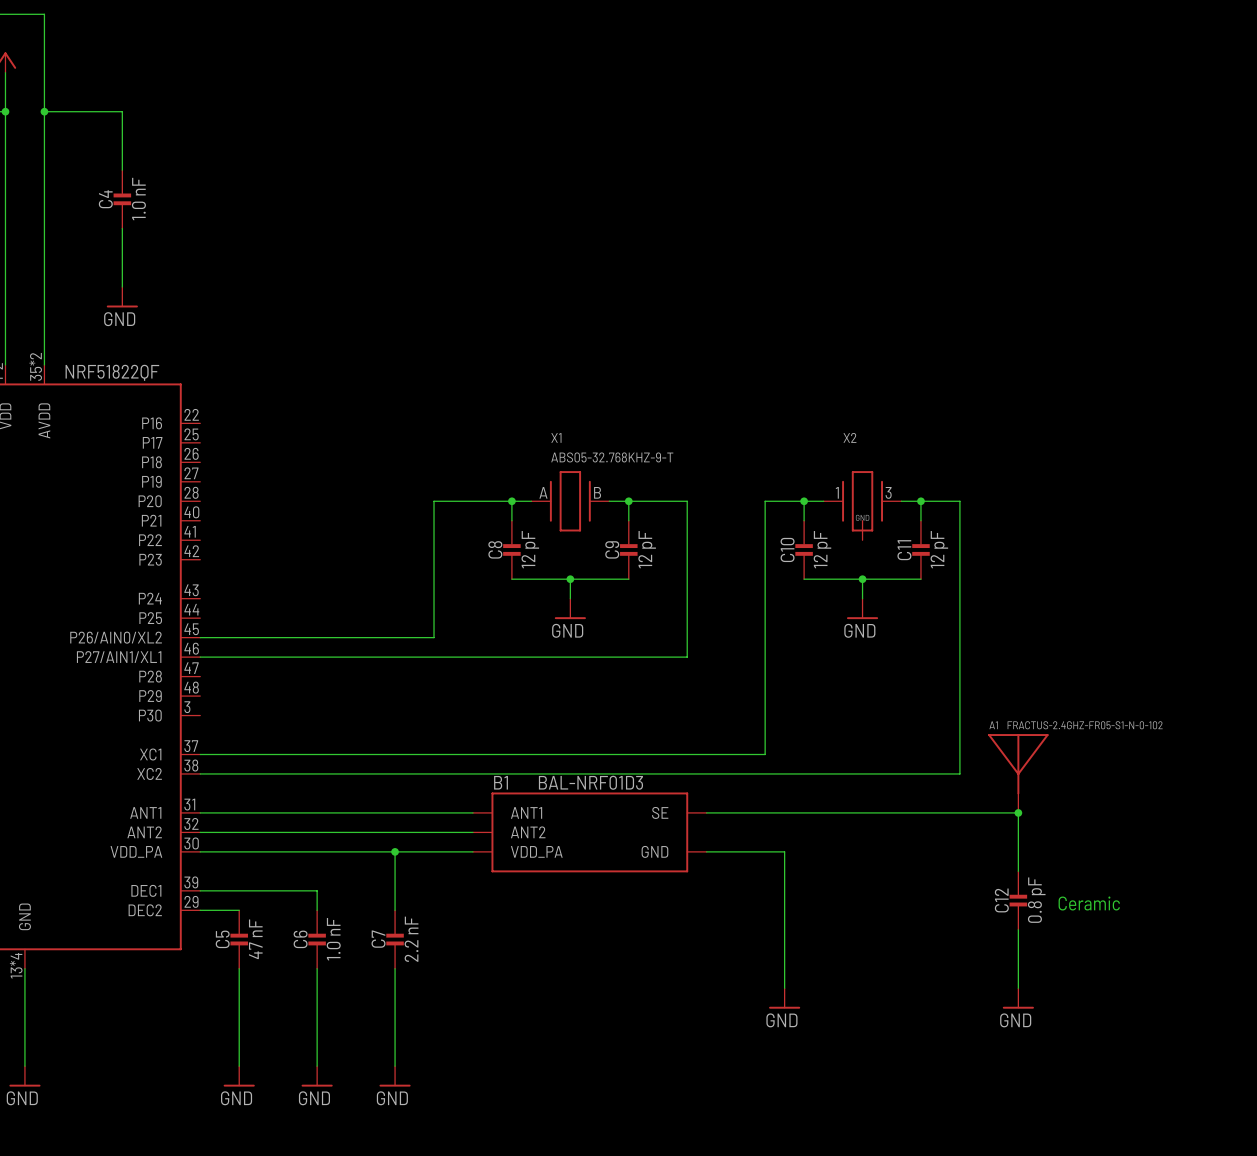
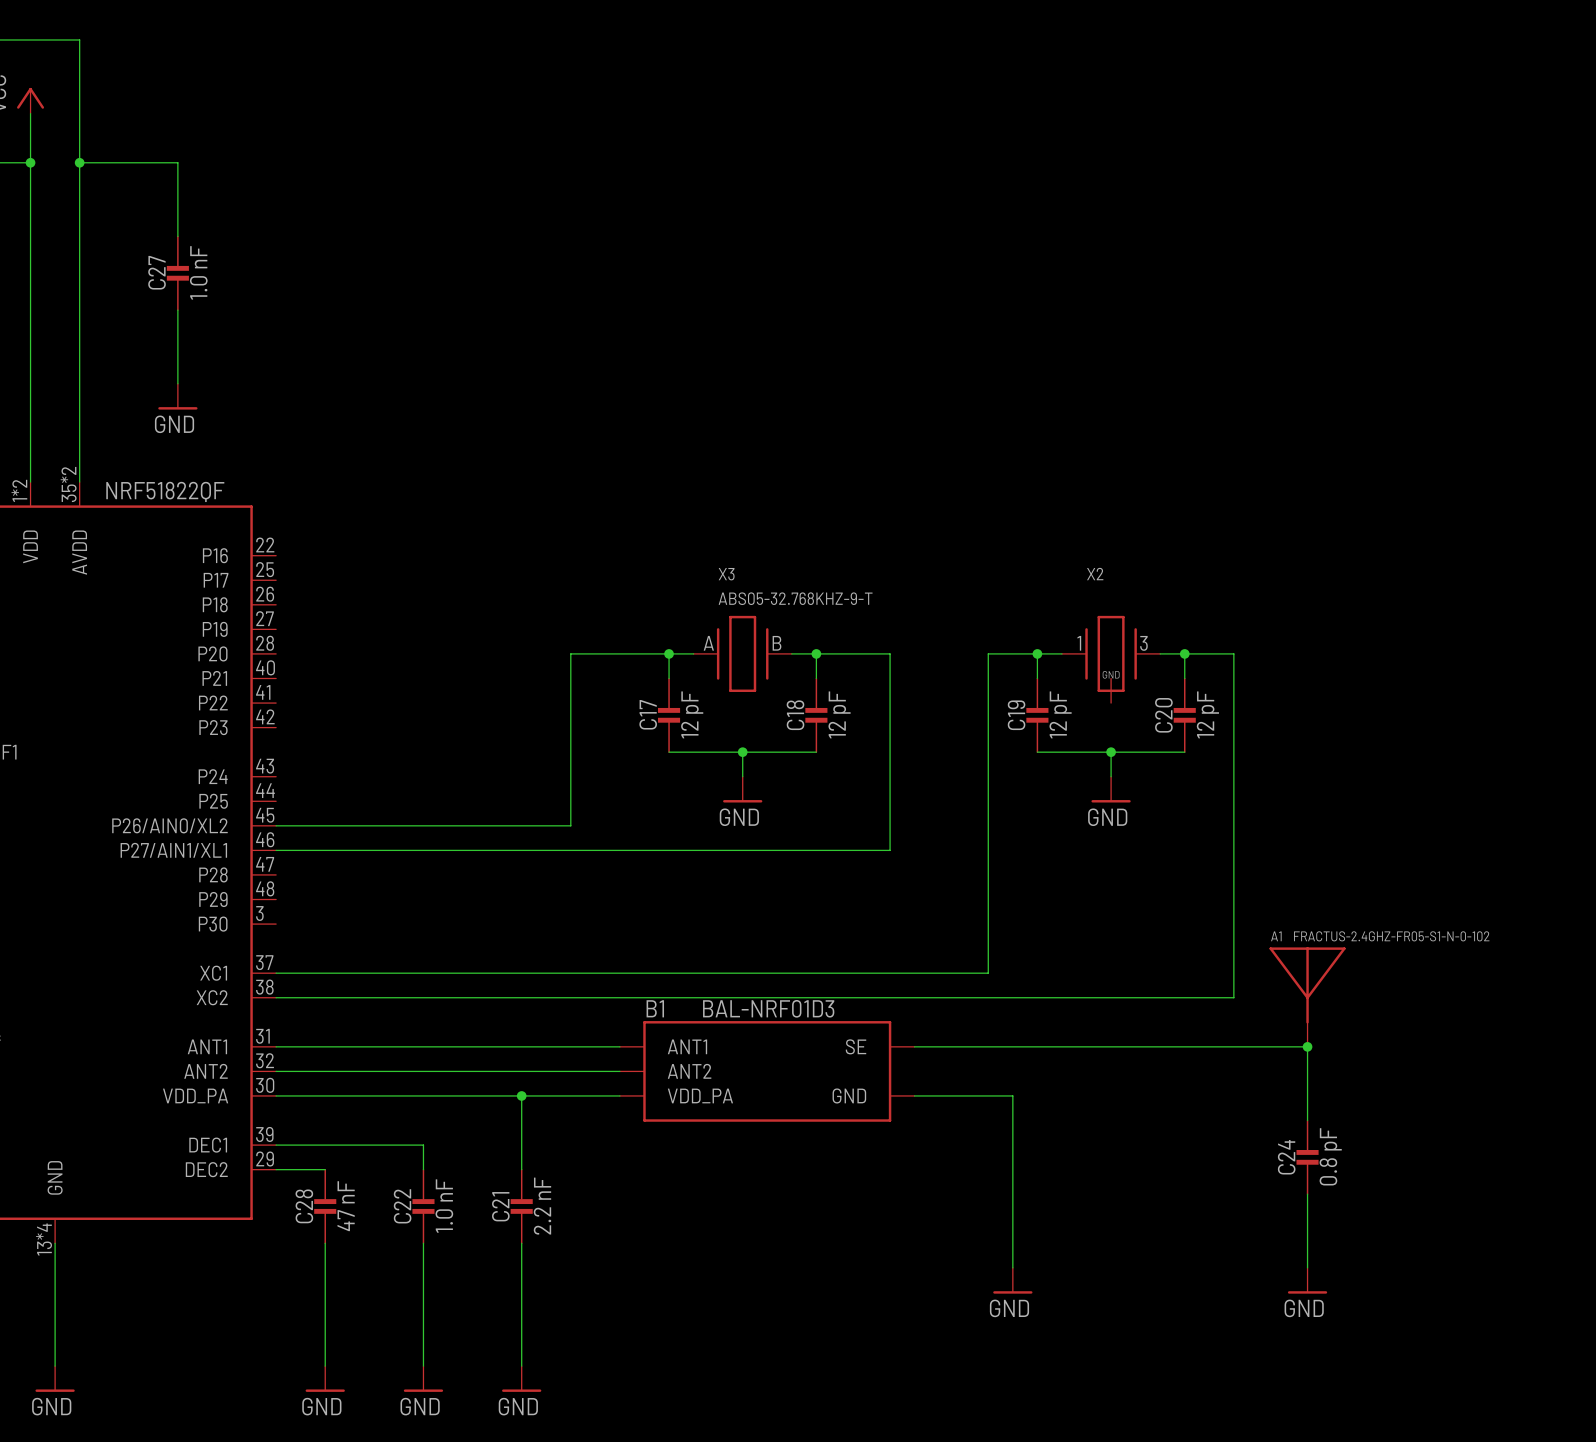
C4 name: C4 (105, 199) -> C27 (157, 272)
X1 name: X1 (556, 437) -> X3 (726, 574)
C8 name: C8 (495, 549) -> C17 (648, 714)
C9 name: C9 (612, 549) -> C18 (795, 715)
C10 name: C10 (787, 549) -> C19 (1016, 715)
C11 name: C11 (904, 550) -> C20 (1163, 715)
C12 name: C12 (1001, 900) -> C24 (1286, 1157)
text: Ceramic (1089, 903) -> none
C5 name: C5 (222, 939) -> C28 (304, 1206)
C6 name: C6 (300, 939) -> C22 (402, 1206)
C7 name: C7 (378, 939) -> C21 (500, 1206)

